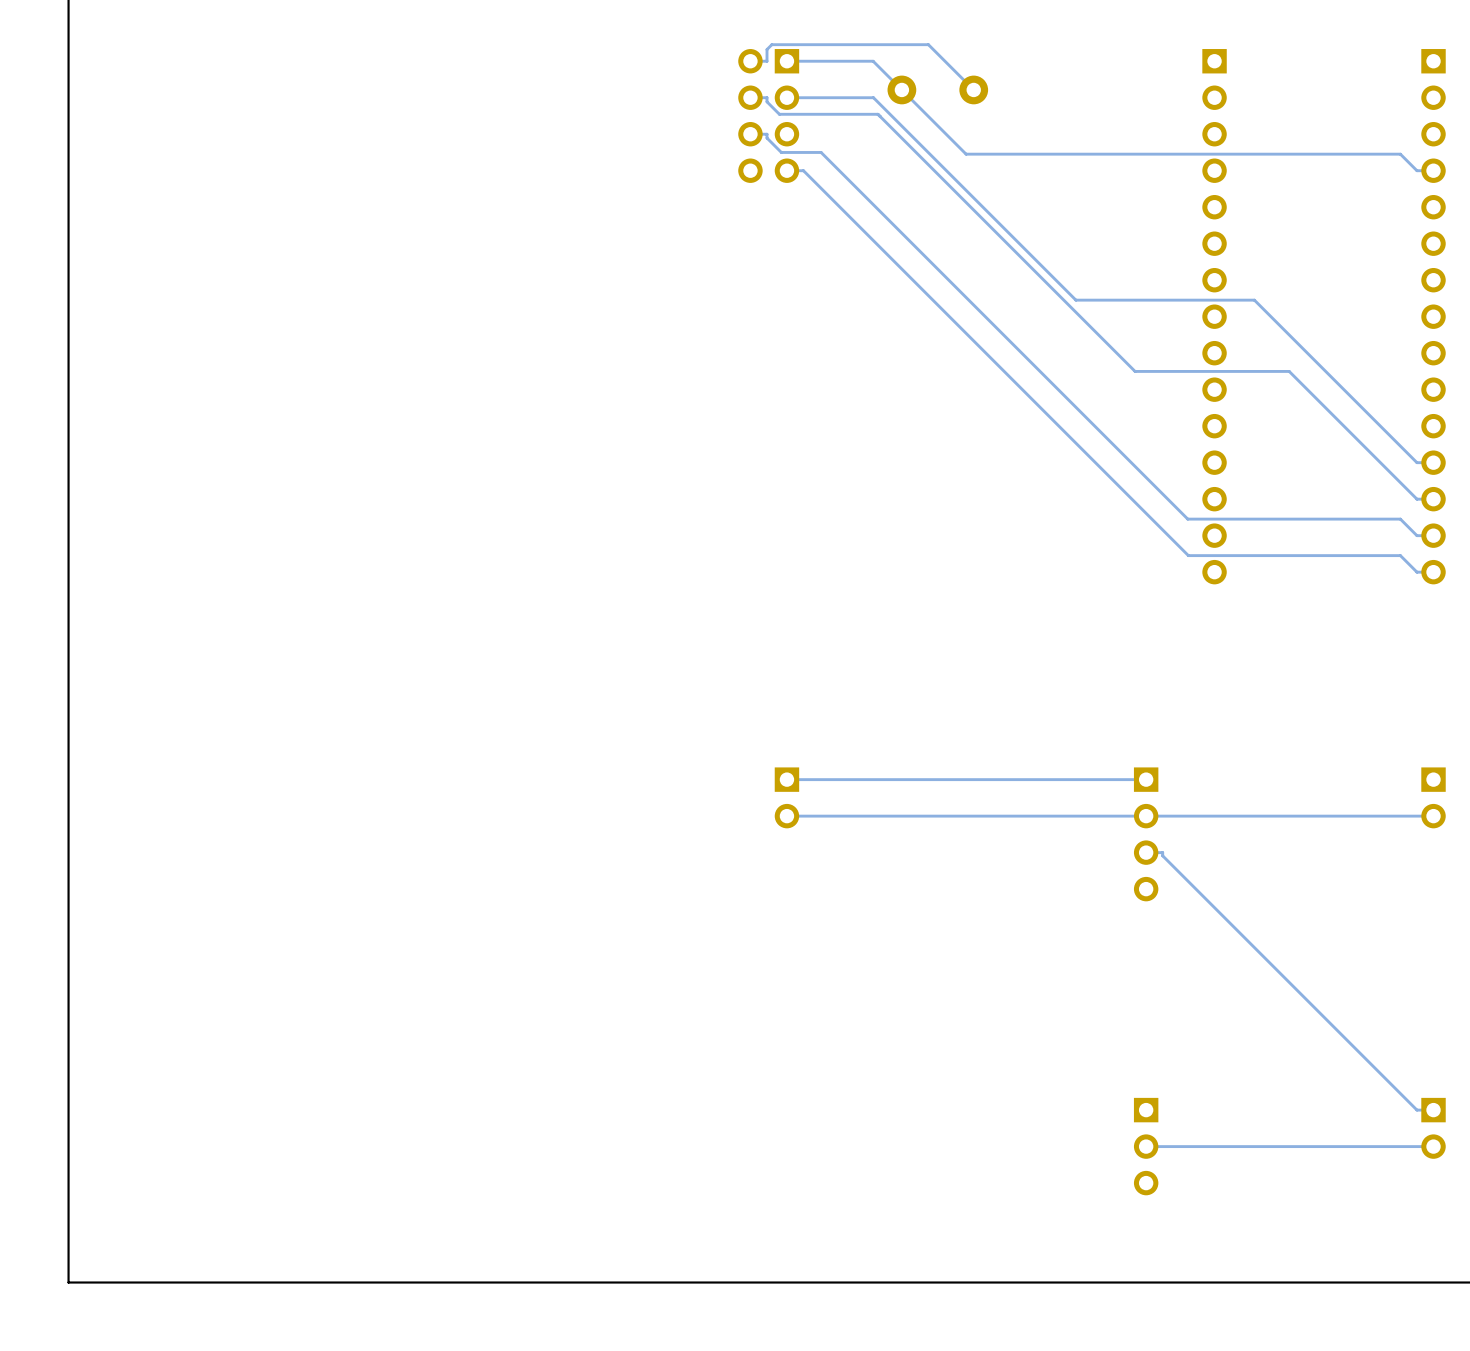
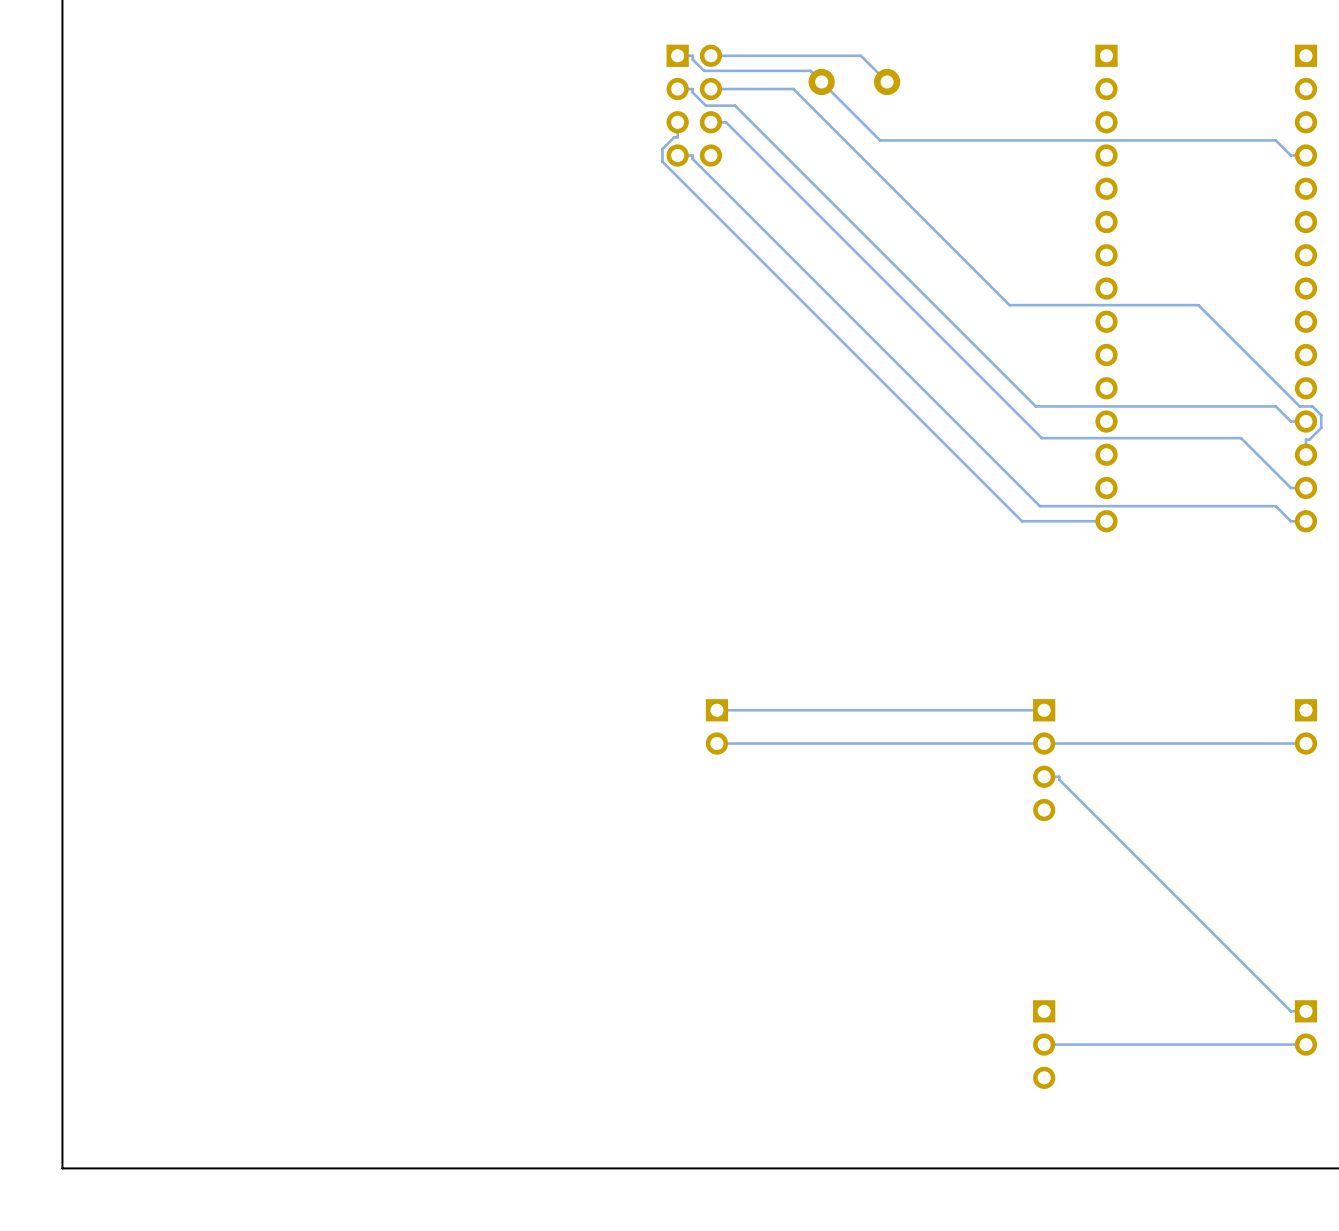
part footprint: [738, 49, 800, 183] -> [666, 44, 723, 167]
track: (873, 61) (889, 77) -> (795, 55) (860, 55)
track: (945, 61) (928, 44) (771, 44) (767, 49) (767, 61) (760, 61) -> (810, 70) (704, 70) (692, 59) (692, 55)
track: (760, 97) (767, 97) (767, 101) (779, 114) (877, 114) (1135, 371) (1289, 371) (1416, 499) (1433, 499) -> (692, 89) (692, 92) (705, 105) (735, 105) (1035, 406) (1275, 406)
track: (870, 97) (873, 97) (1075, 300) (1254, 300) (1400, 446) -> (793, 89) (1009, 305) (1198, 305) (1299, 406) (1312, 406) (1321, 415) (1321, 427) (1309, 439) (1305, 439) (1305, 454)
track: none -> (677, 122) (677, 137) (674, 137) (662, 149) (662, 161) (1022, 521) (1106, 521)
track: (750, 134) (767, 134) (767, 138) (781, 152) (821, 152) (1187, 519) (1400, 519) -> (710, 122) (725, 122) (1041, 438) (1241, 438) (1275, 472)
track: (786, 170) (803, 170) (1188, 555) -> (677, 155) (692, 155) (692, 159) (1039, 506) (1082, 506)

